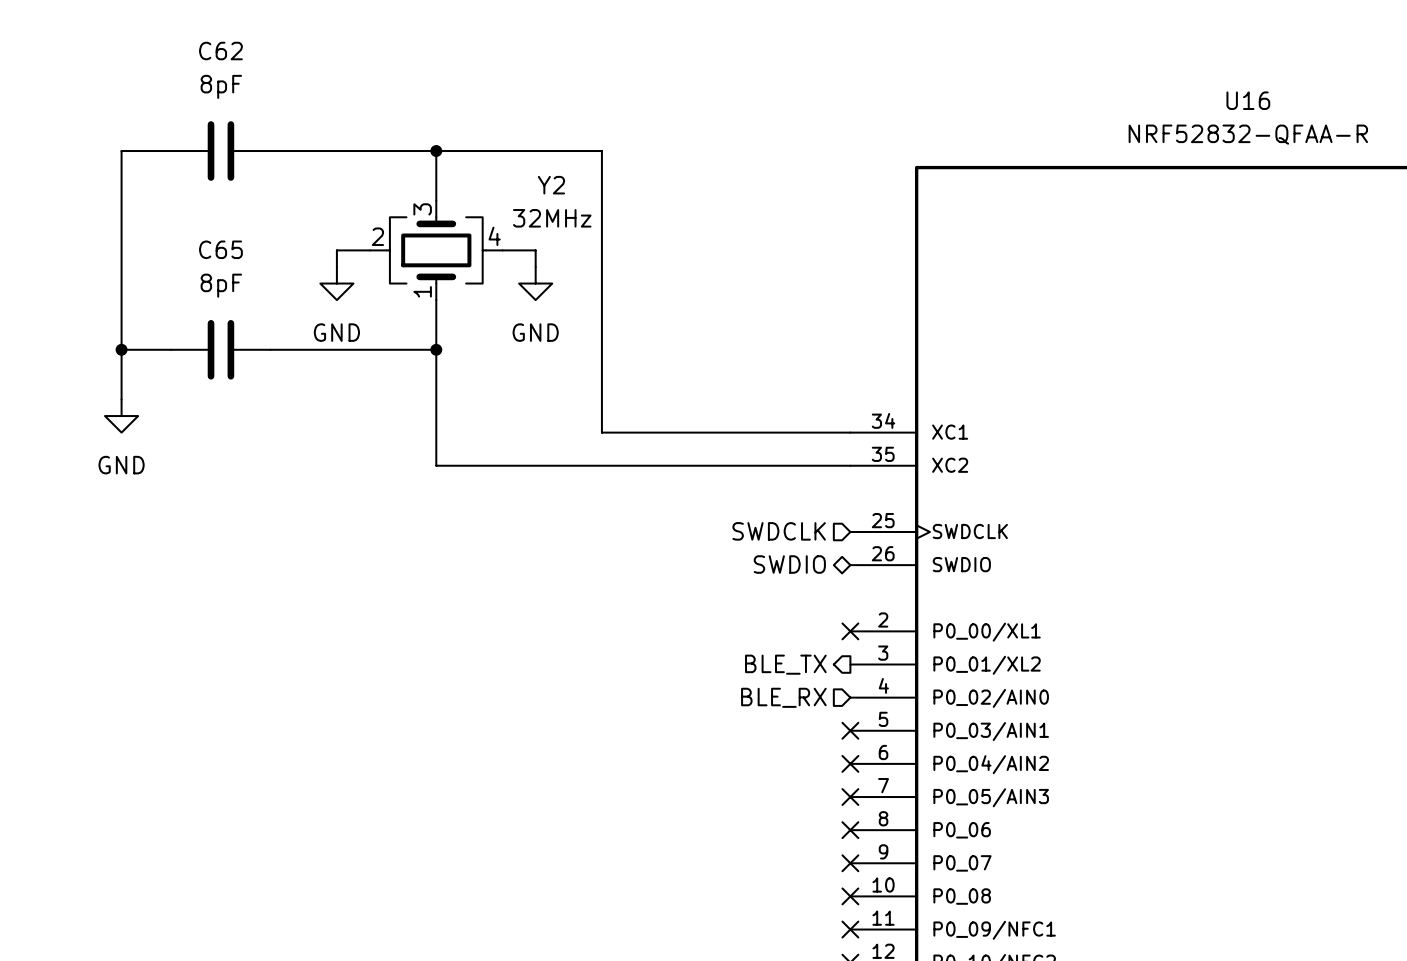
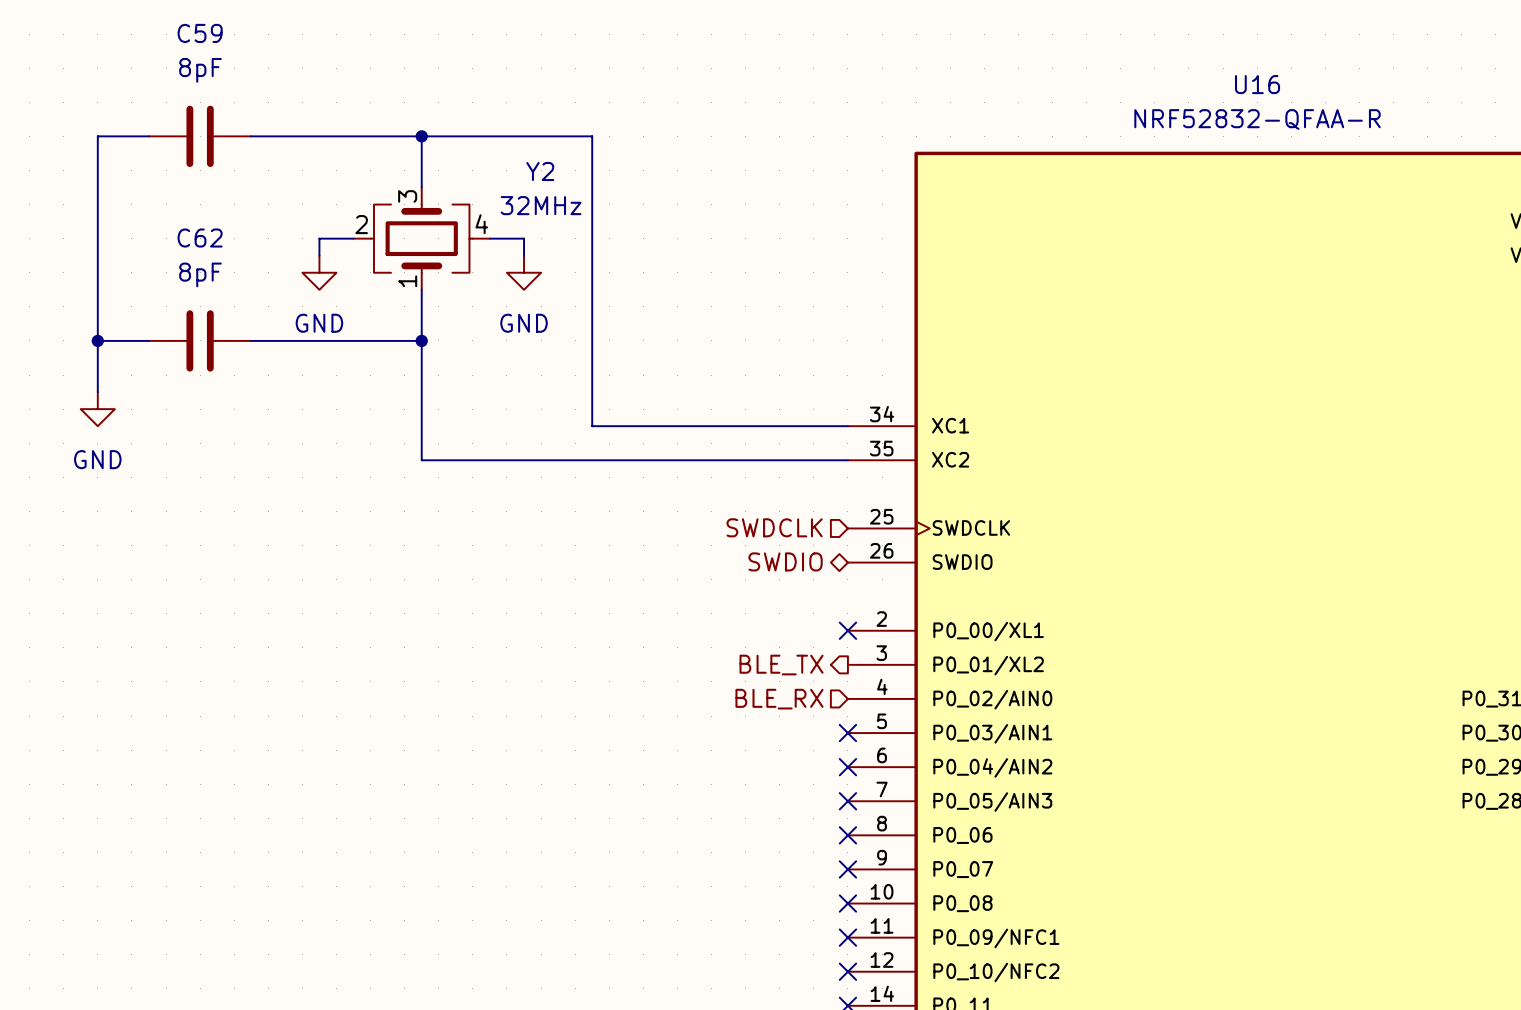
C62 name: C62 (220, 51) -> C59 (200, 33)
C65 name: C65 (220, 249) -> C62 (200, 238)

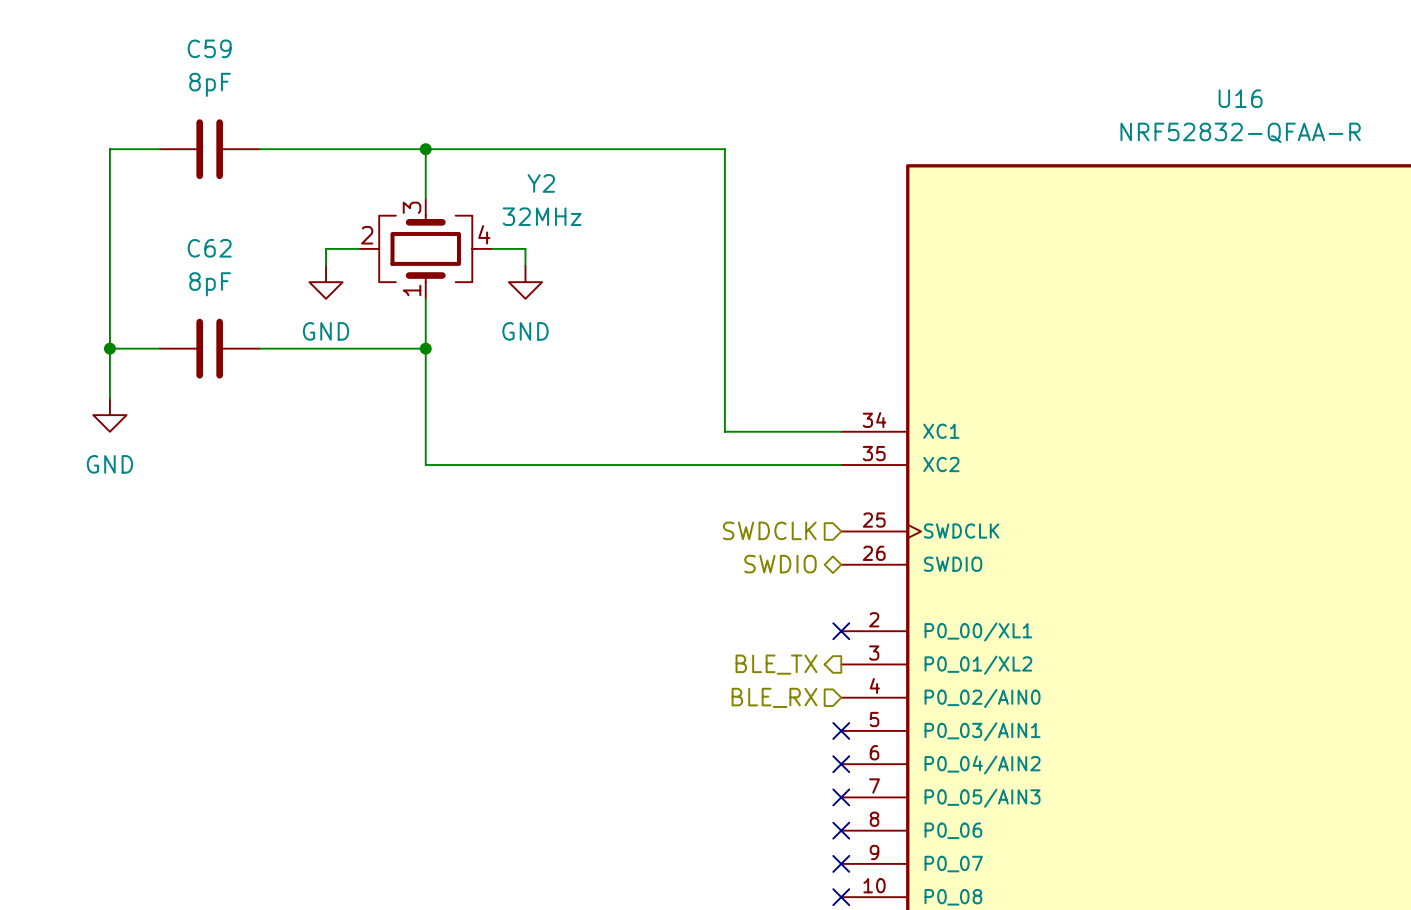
wire: (592, 136) (592, 426) (728, 426) -> (591, 149) (724, 149) (724, 431)

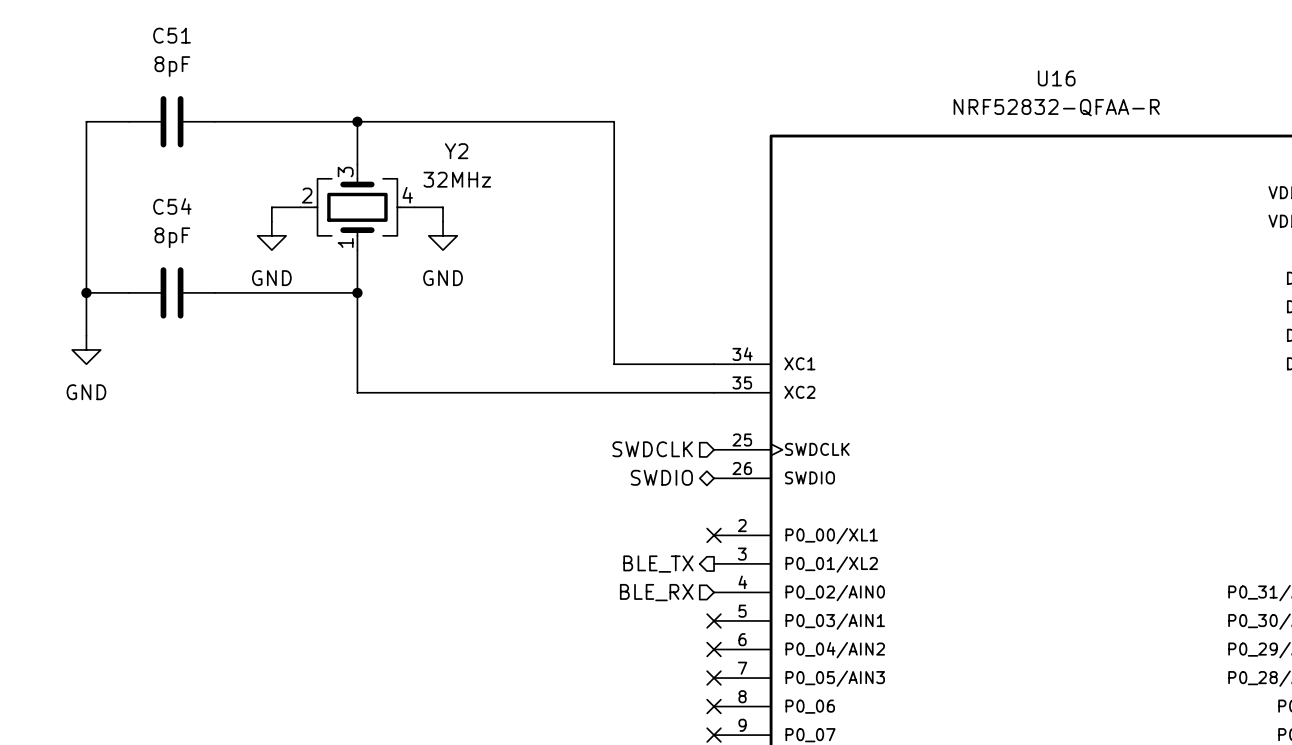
C59 name: C59 (209, 48) -> C51 (172, 35)
C62 name: C62 (209, 248) -> C54 (172, 206)

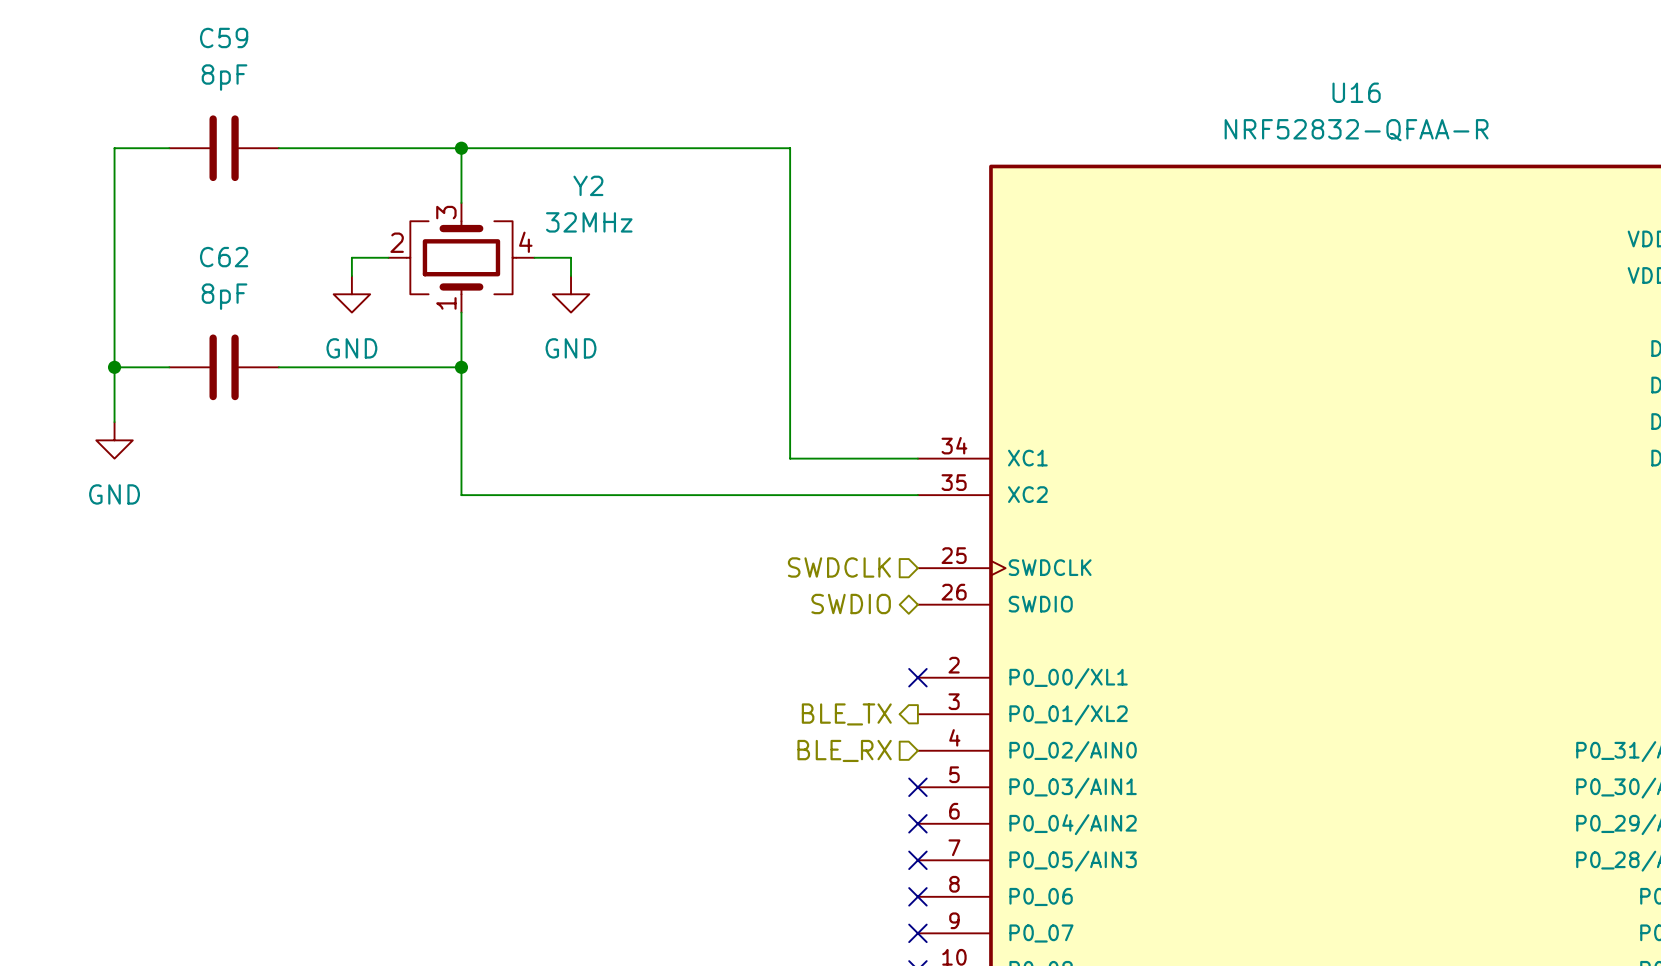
C51 name: C51 (172, 35) -> C59 (224, 37)
C54 name: C54 (172, 206) -> C62 (224, 257)

